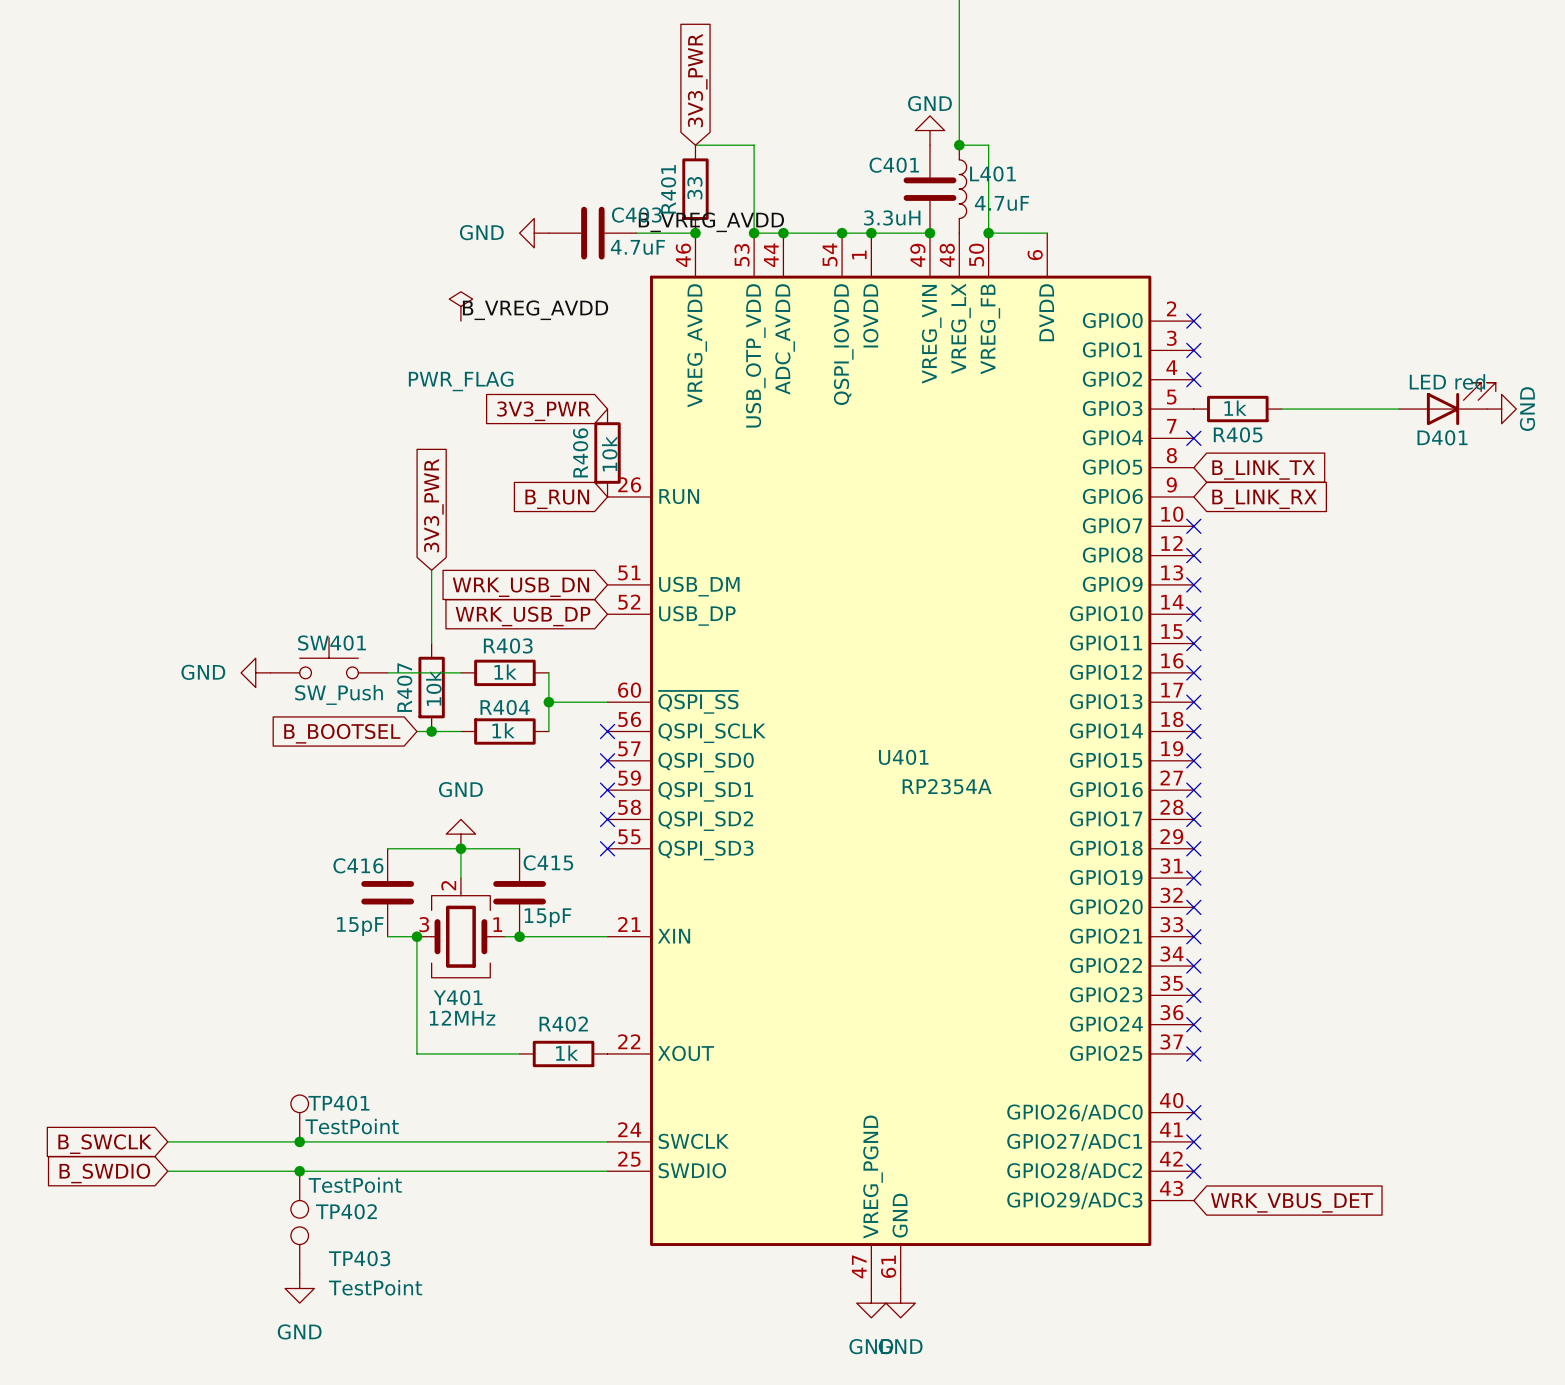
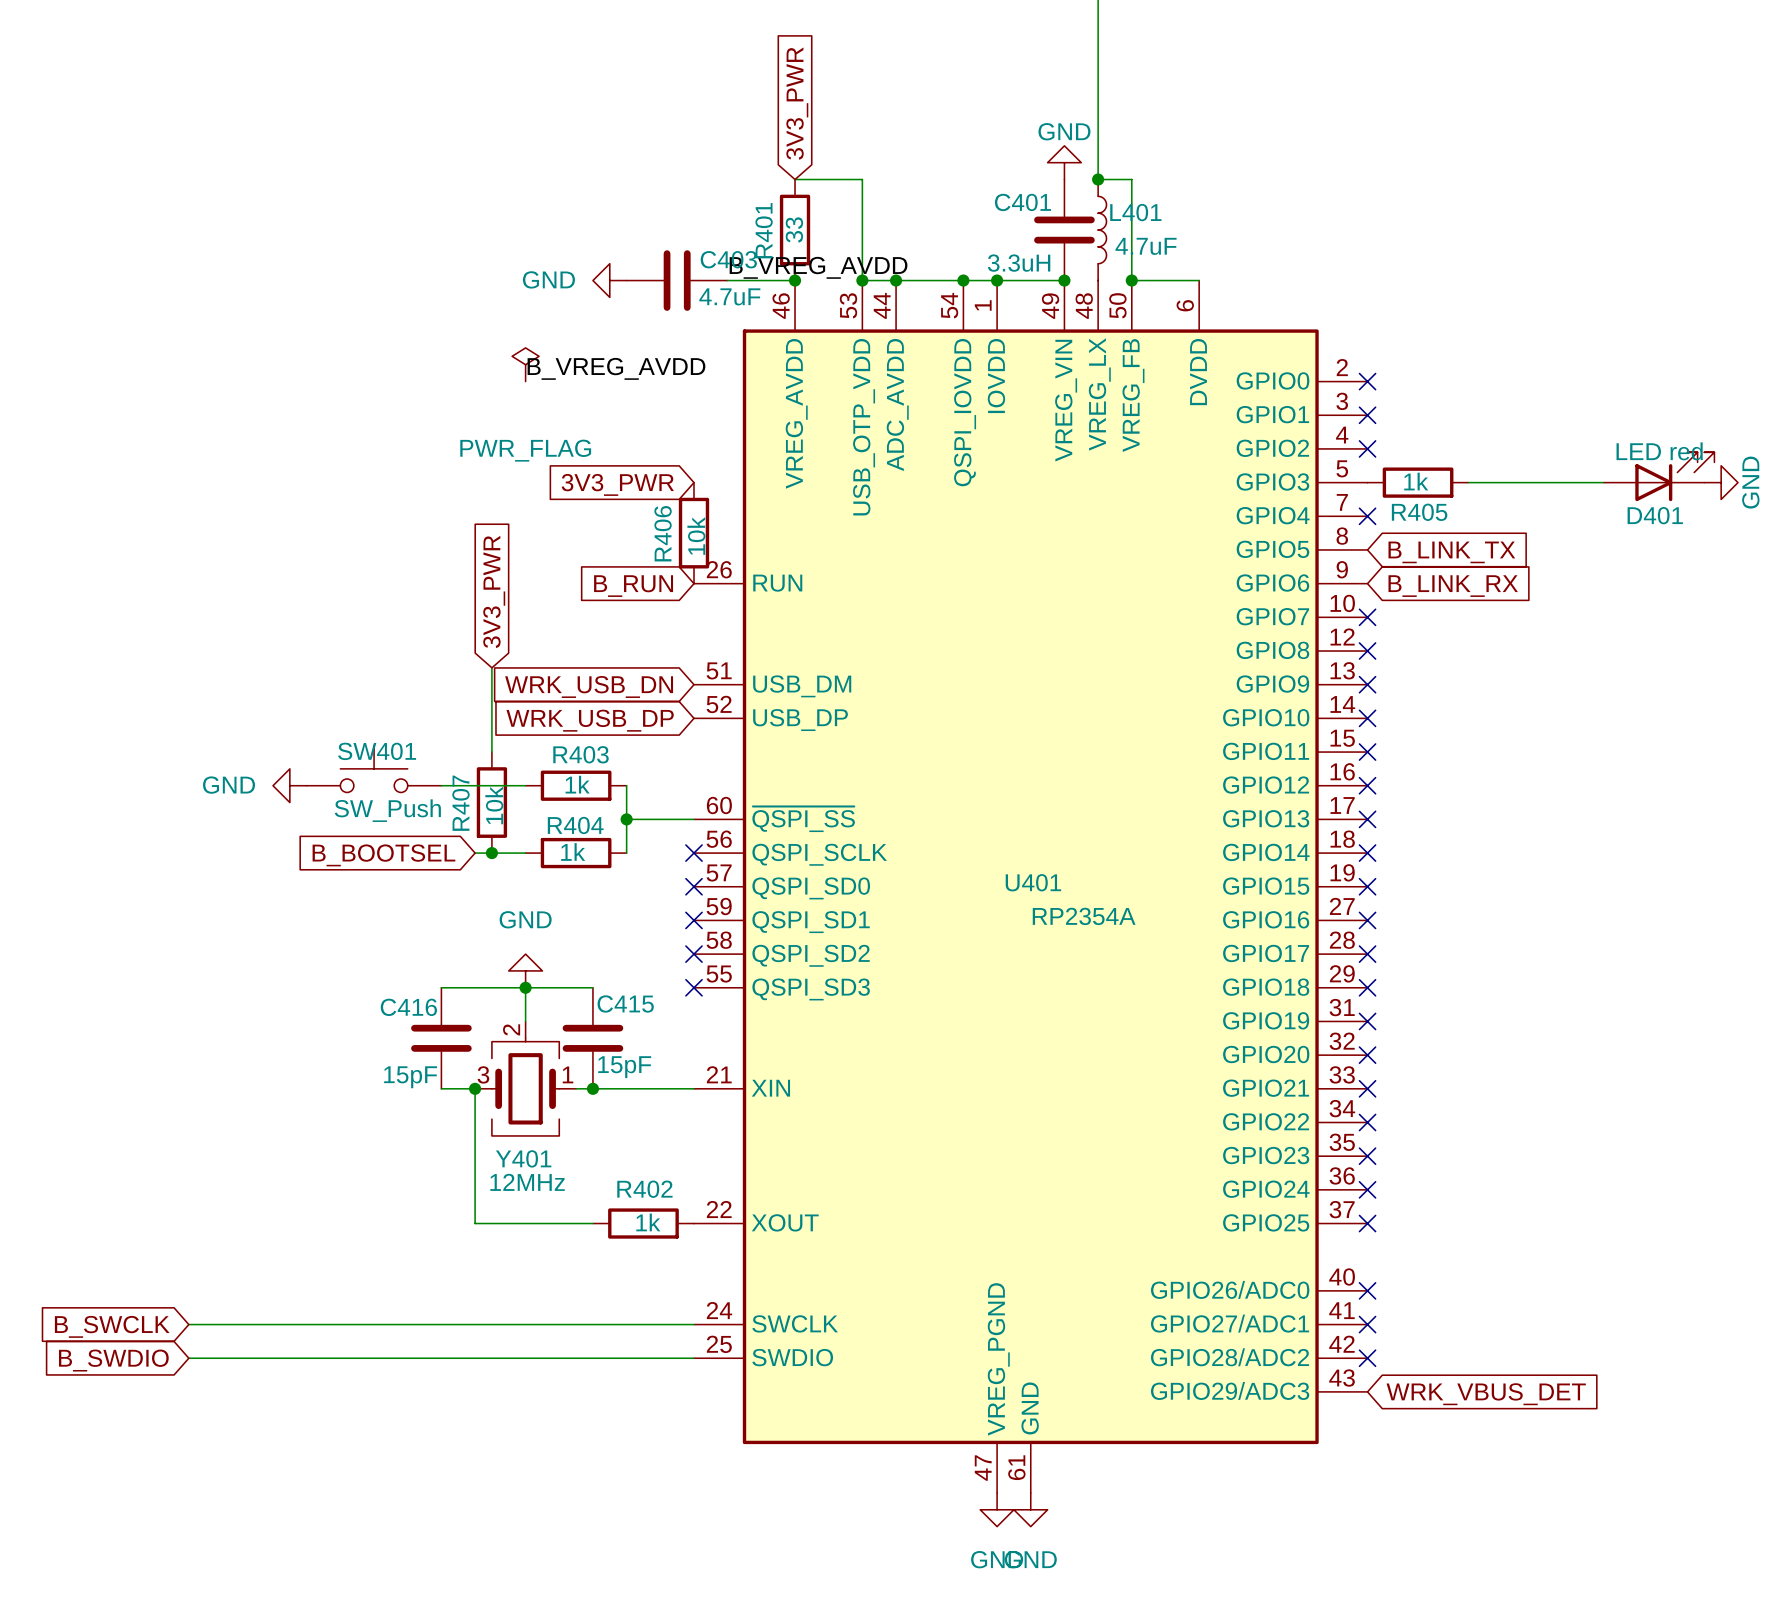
TP401: TestPoint (299, 1118) -> none
junction: (299, 1141) -> none
junction: (299, 1171) -> none
TP402: TestPoint (299, 1194) -> none
TP403: TestPoint (299, 1250) -> none
power symbol: GND (299, 1288) -> none

